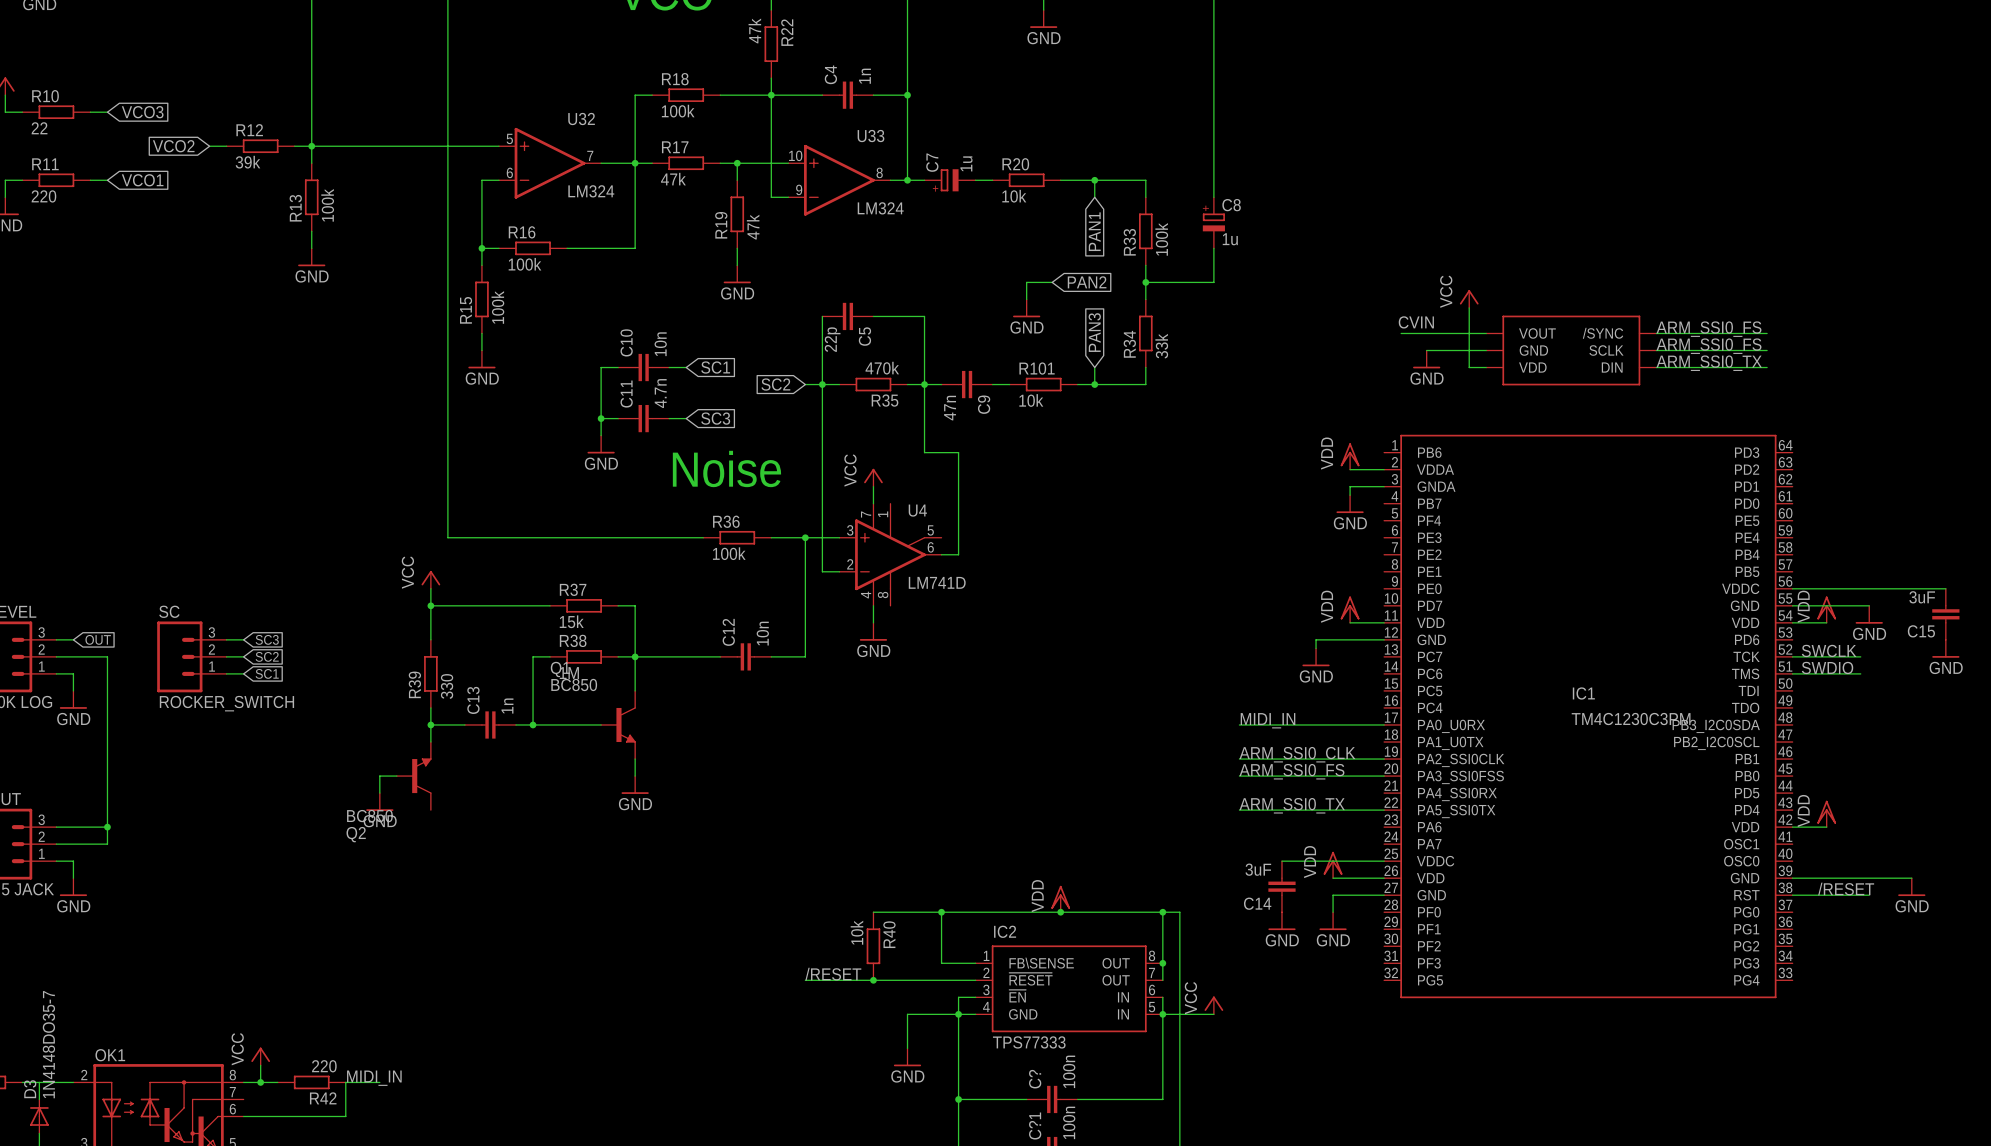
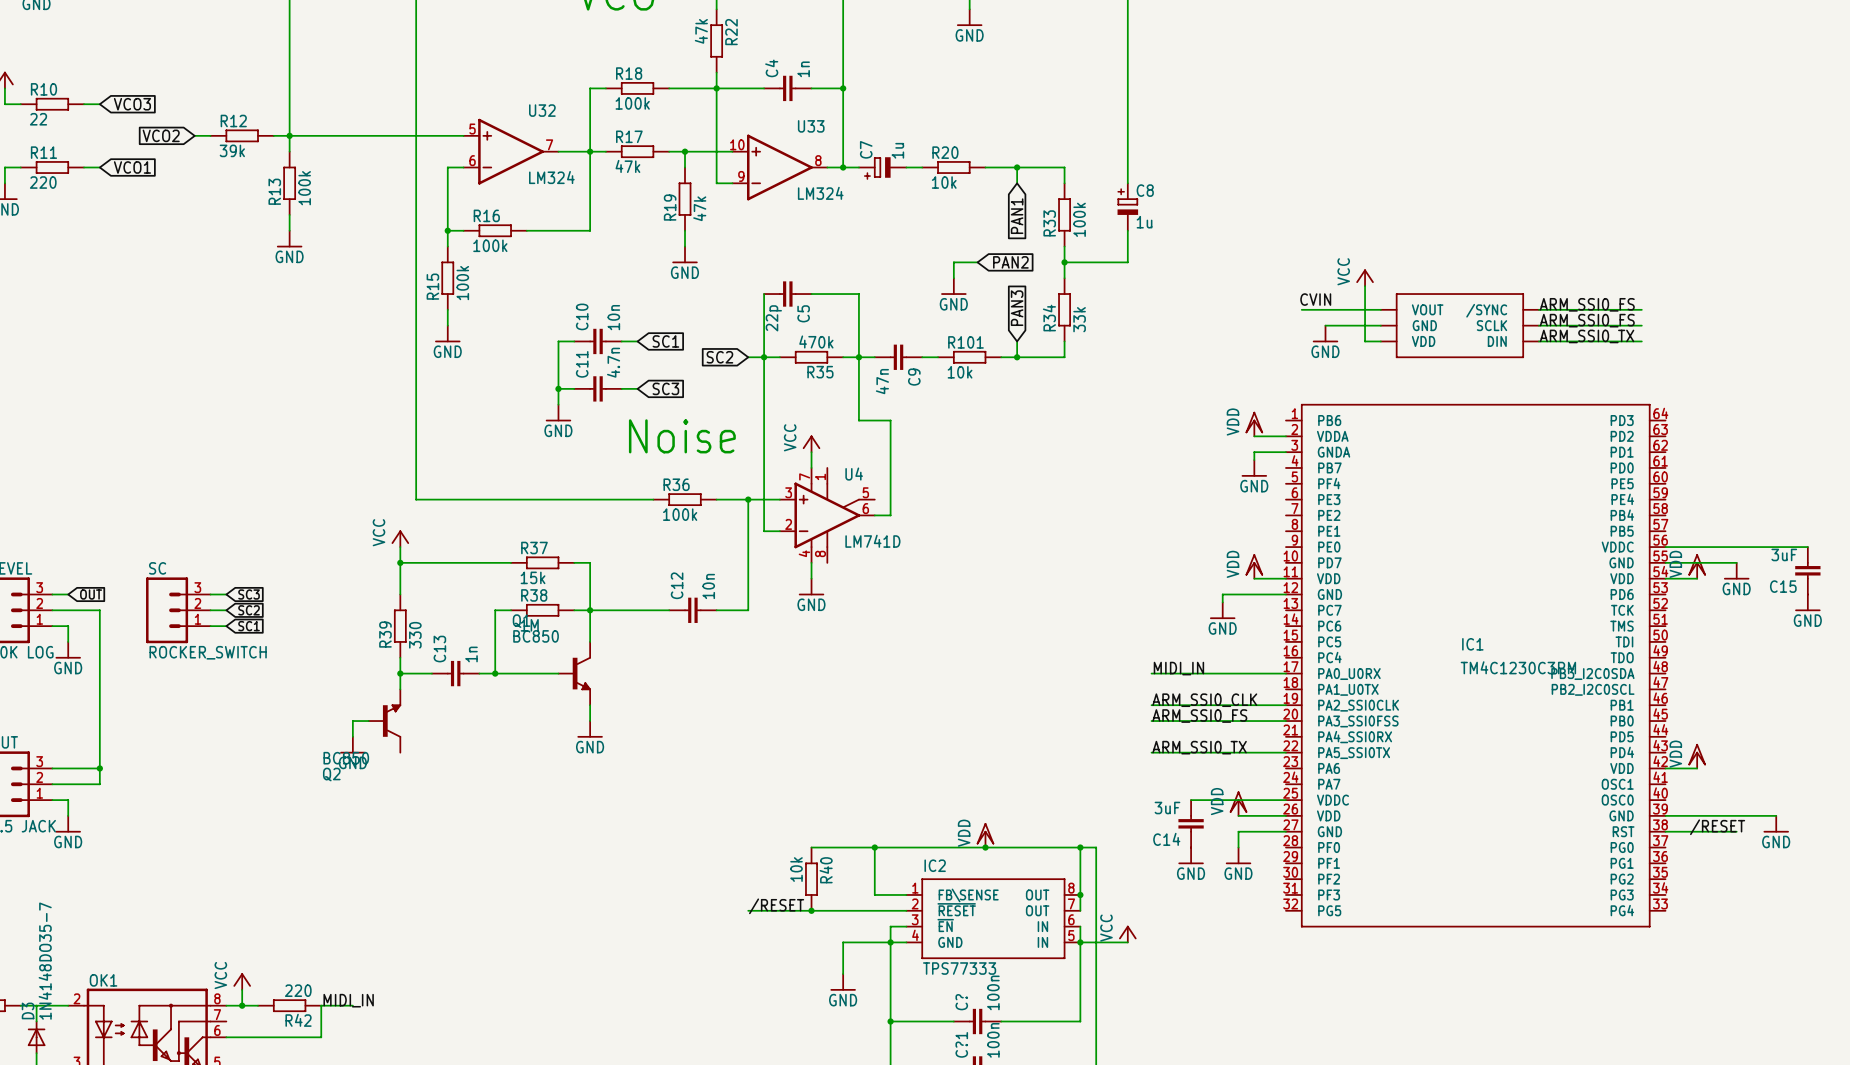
label: SWCLK (1829, 650) -> none
wire: (1792, 656) (1860, 656) -> none
label: SWDIO (1827, 667) -> none
wire: (1792, 673) (1860, 673) -> none

